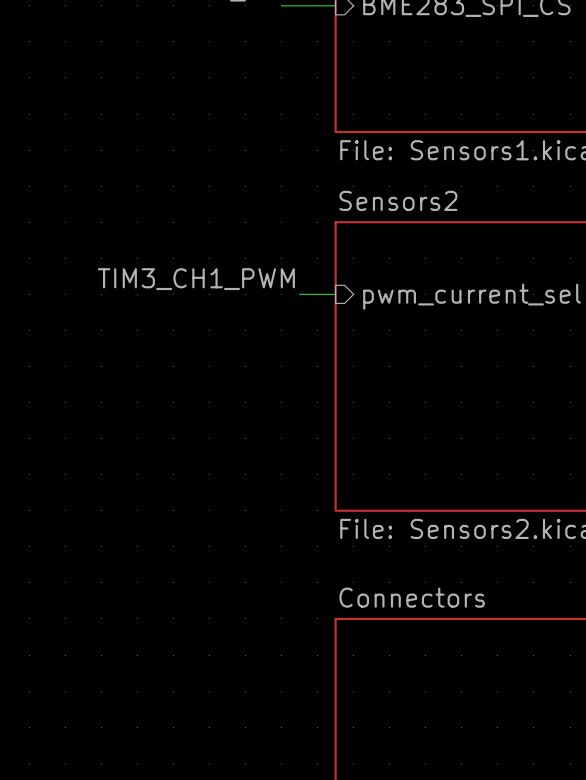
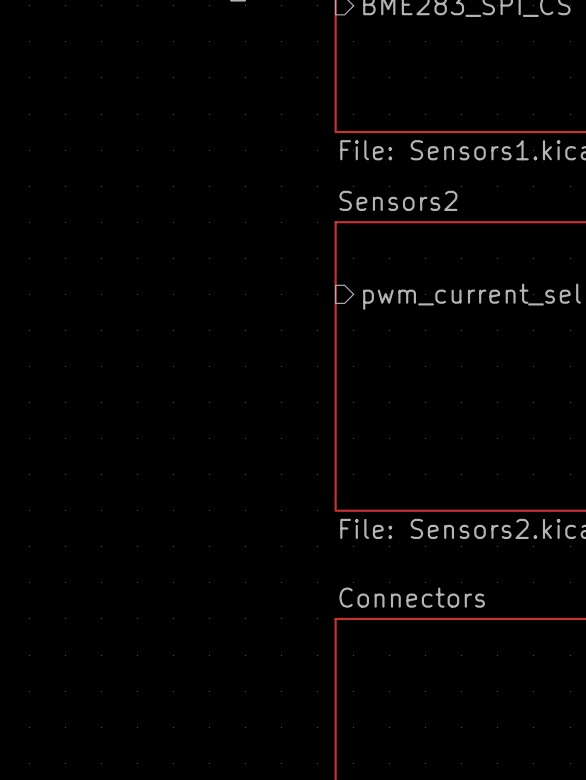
wire: (281, 5) (335, 5) -> none
label: TIM3_CH1_PWM (196, 279) -> none
wire: (299, 294) (335, 294) -> none

